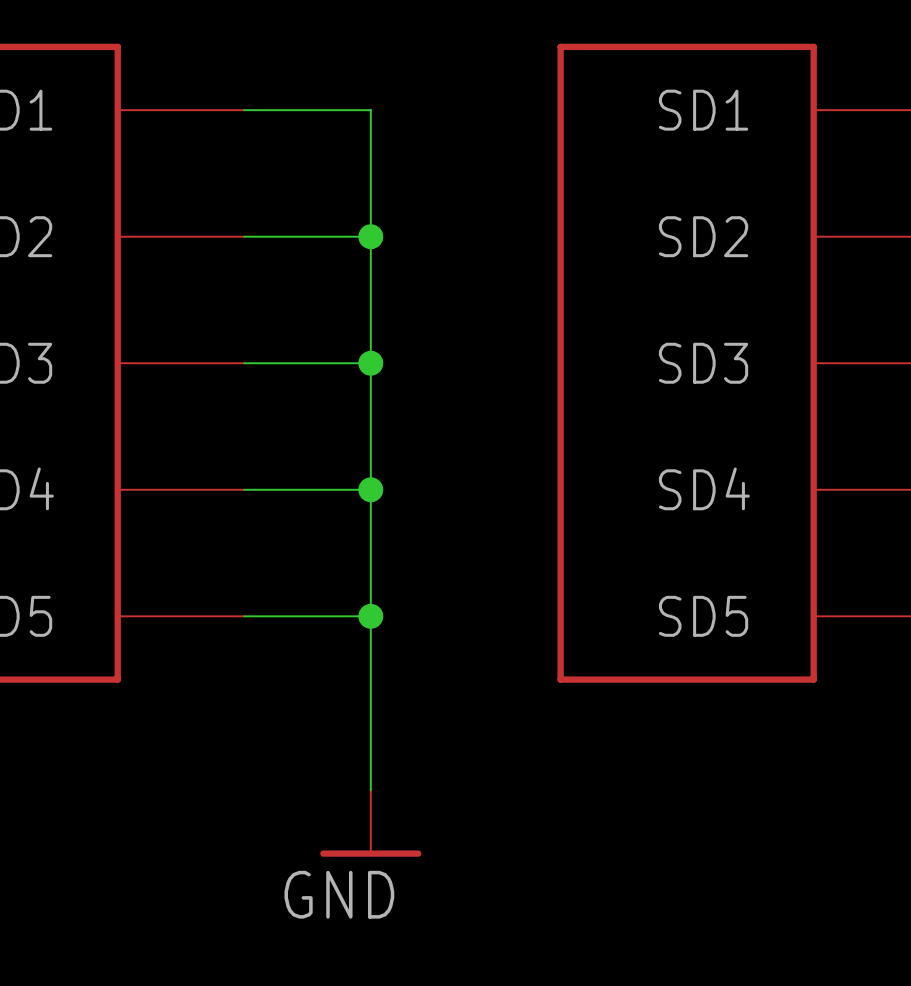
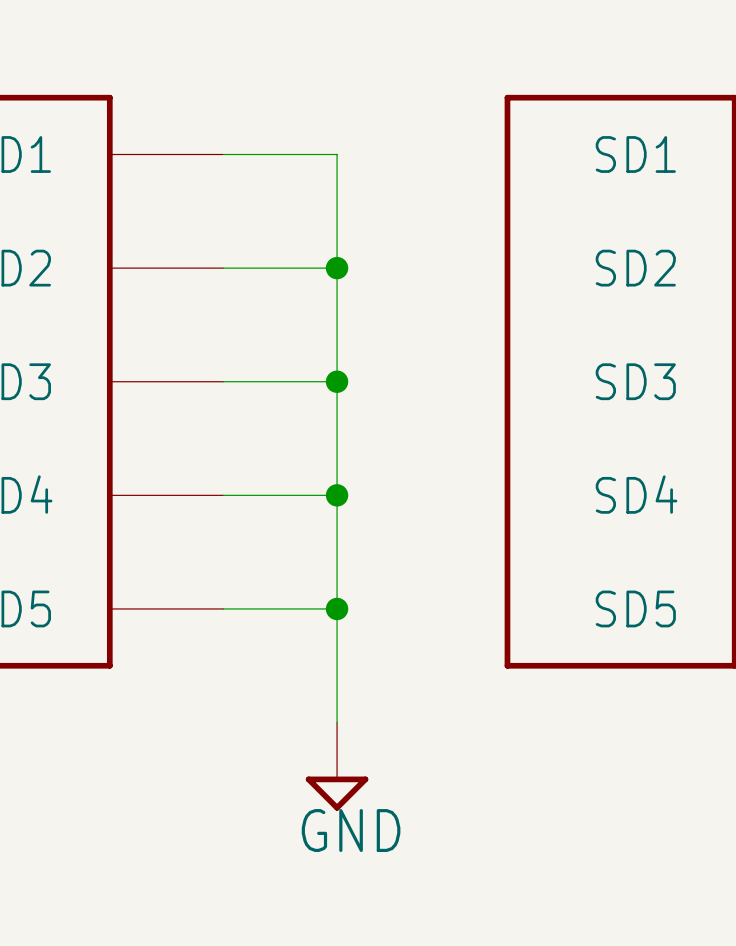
power symbol: none -> GND (337, 766)
power symbol: GND (370, 823) -> none

